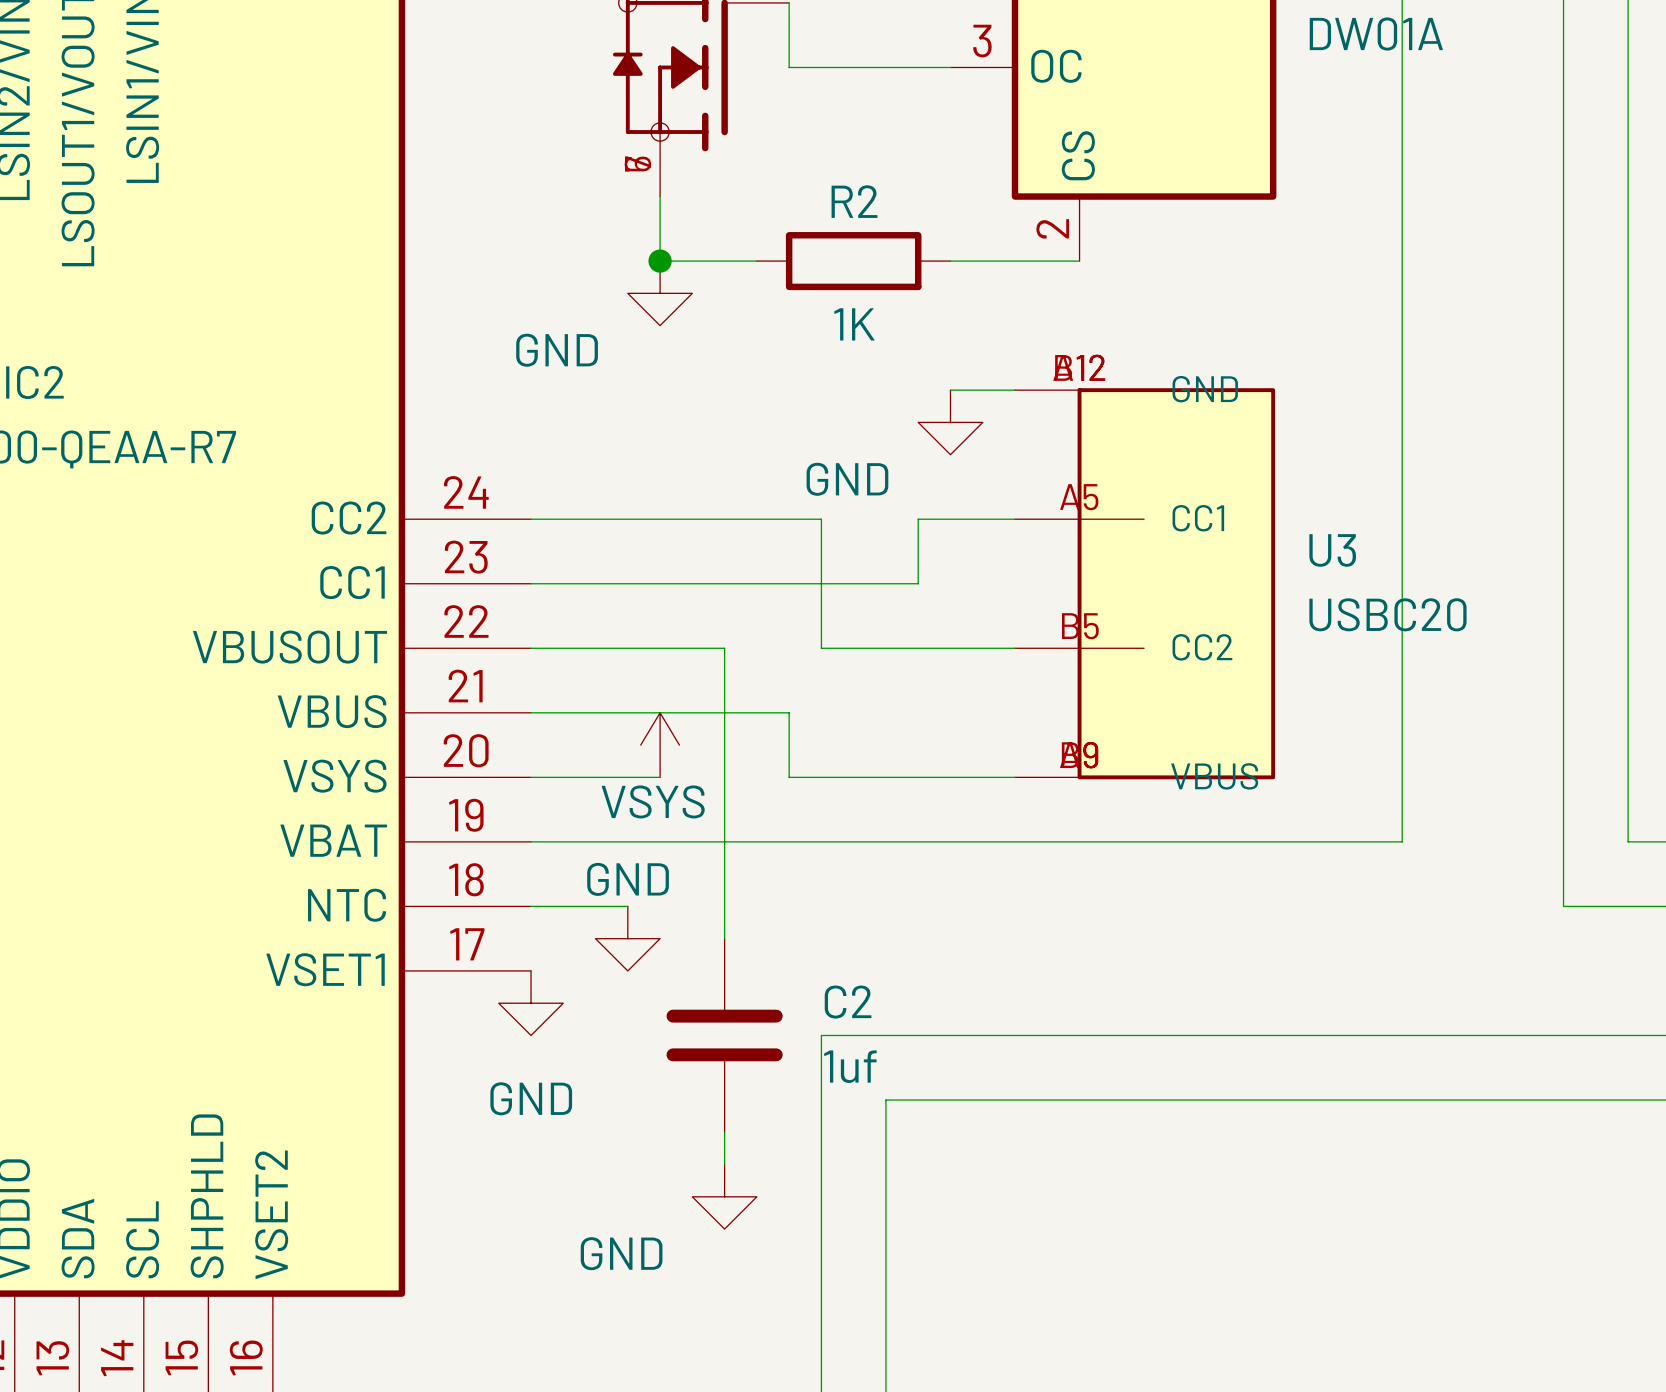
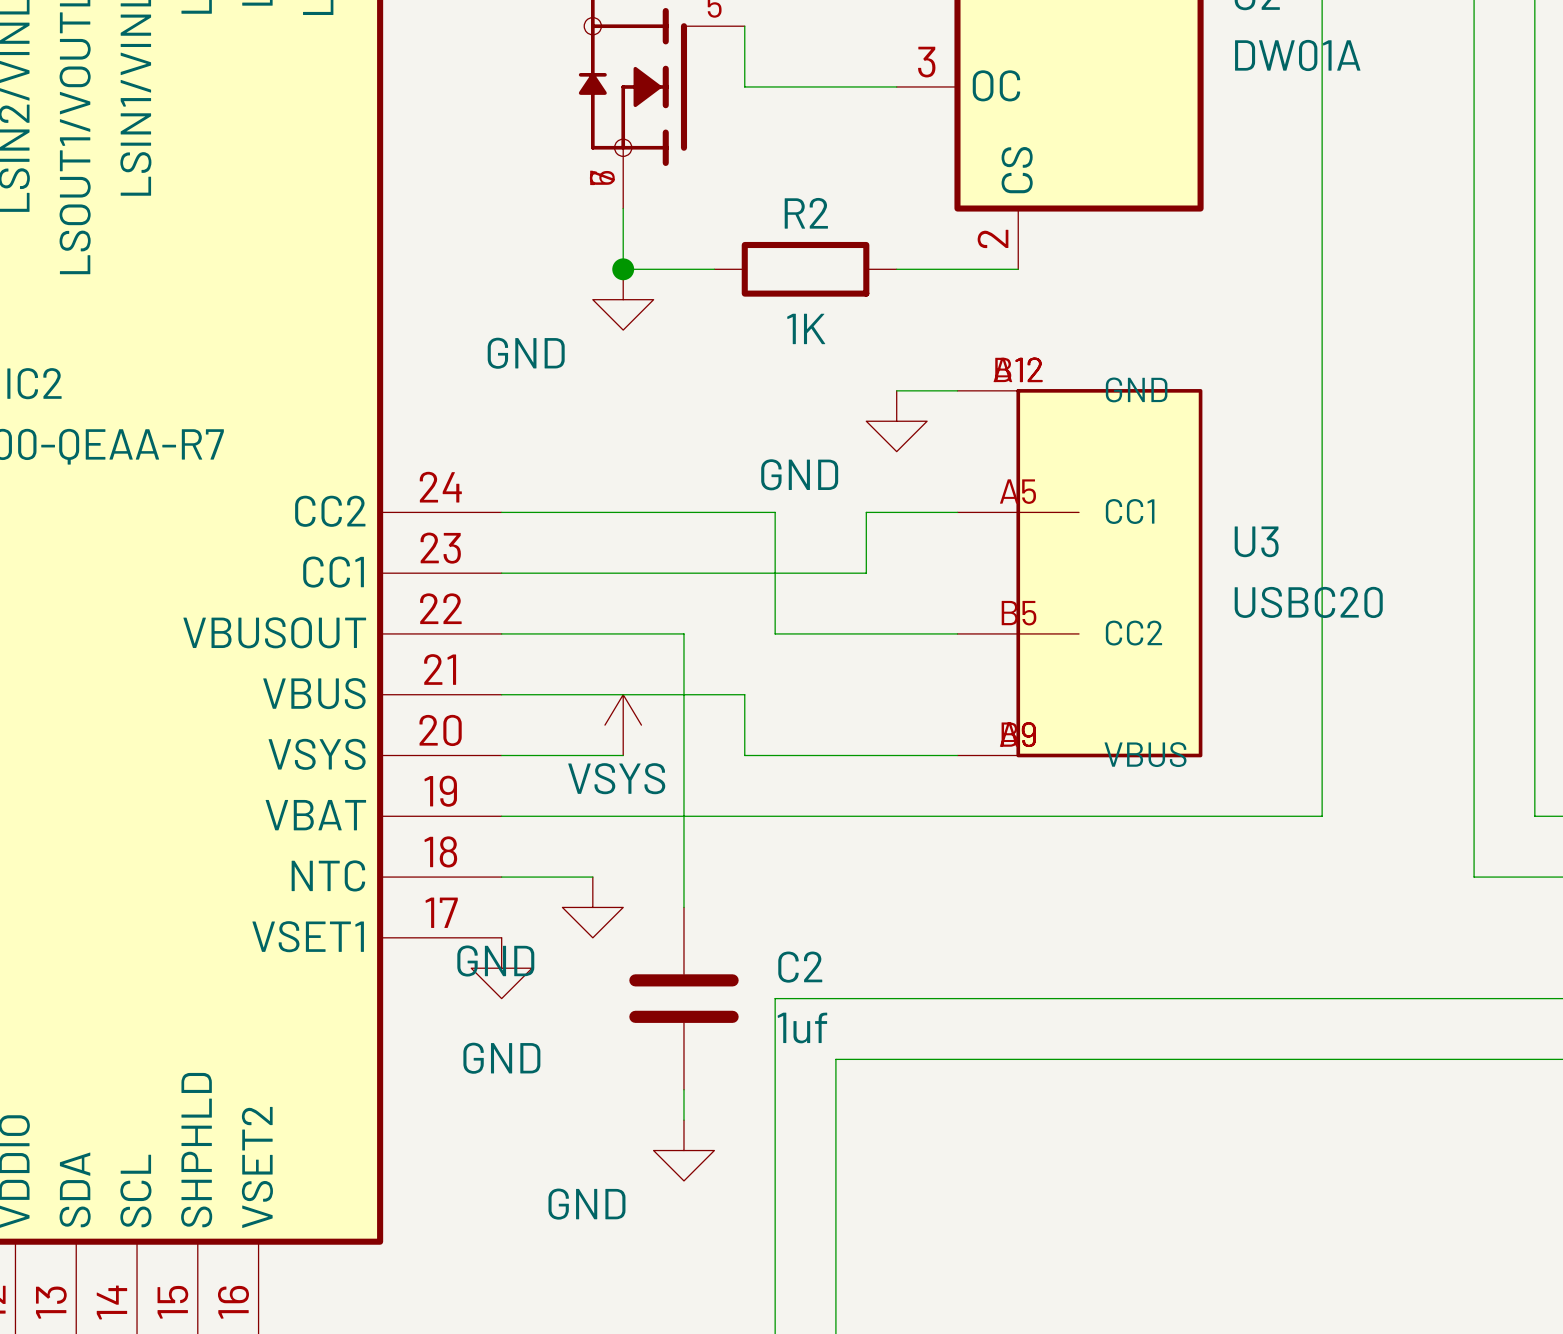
power symbol text position: GND (628, 879) -> GND (495, 961)

